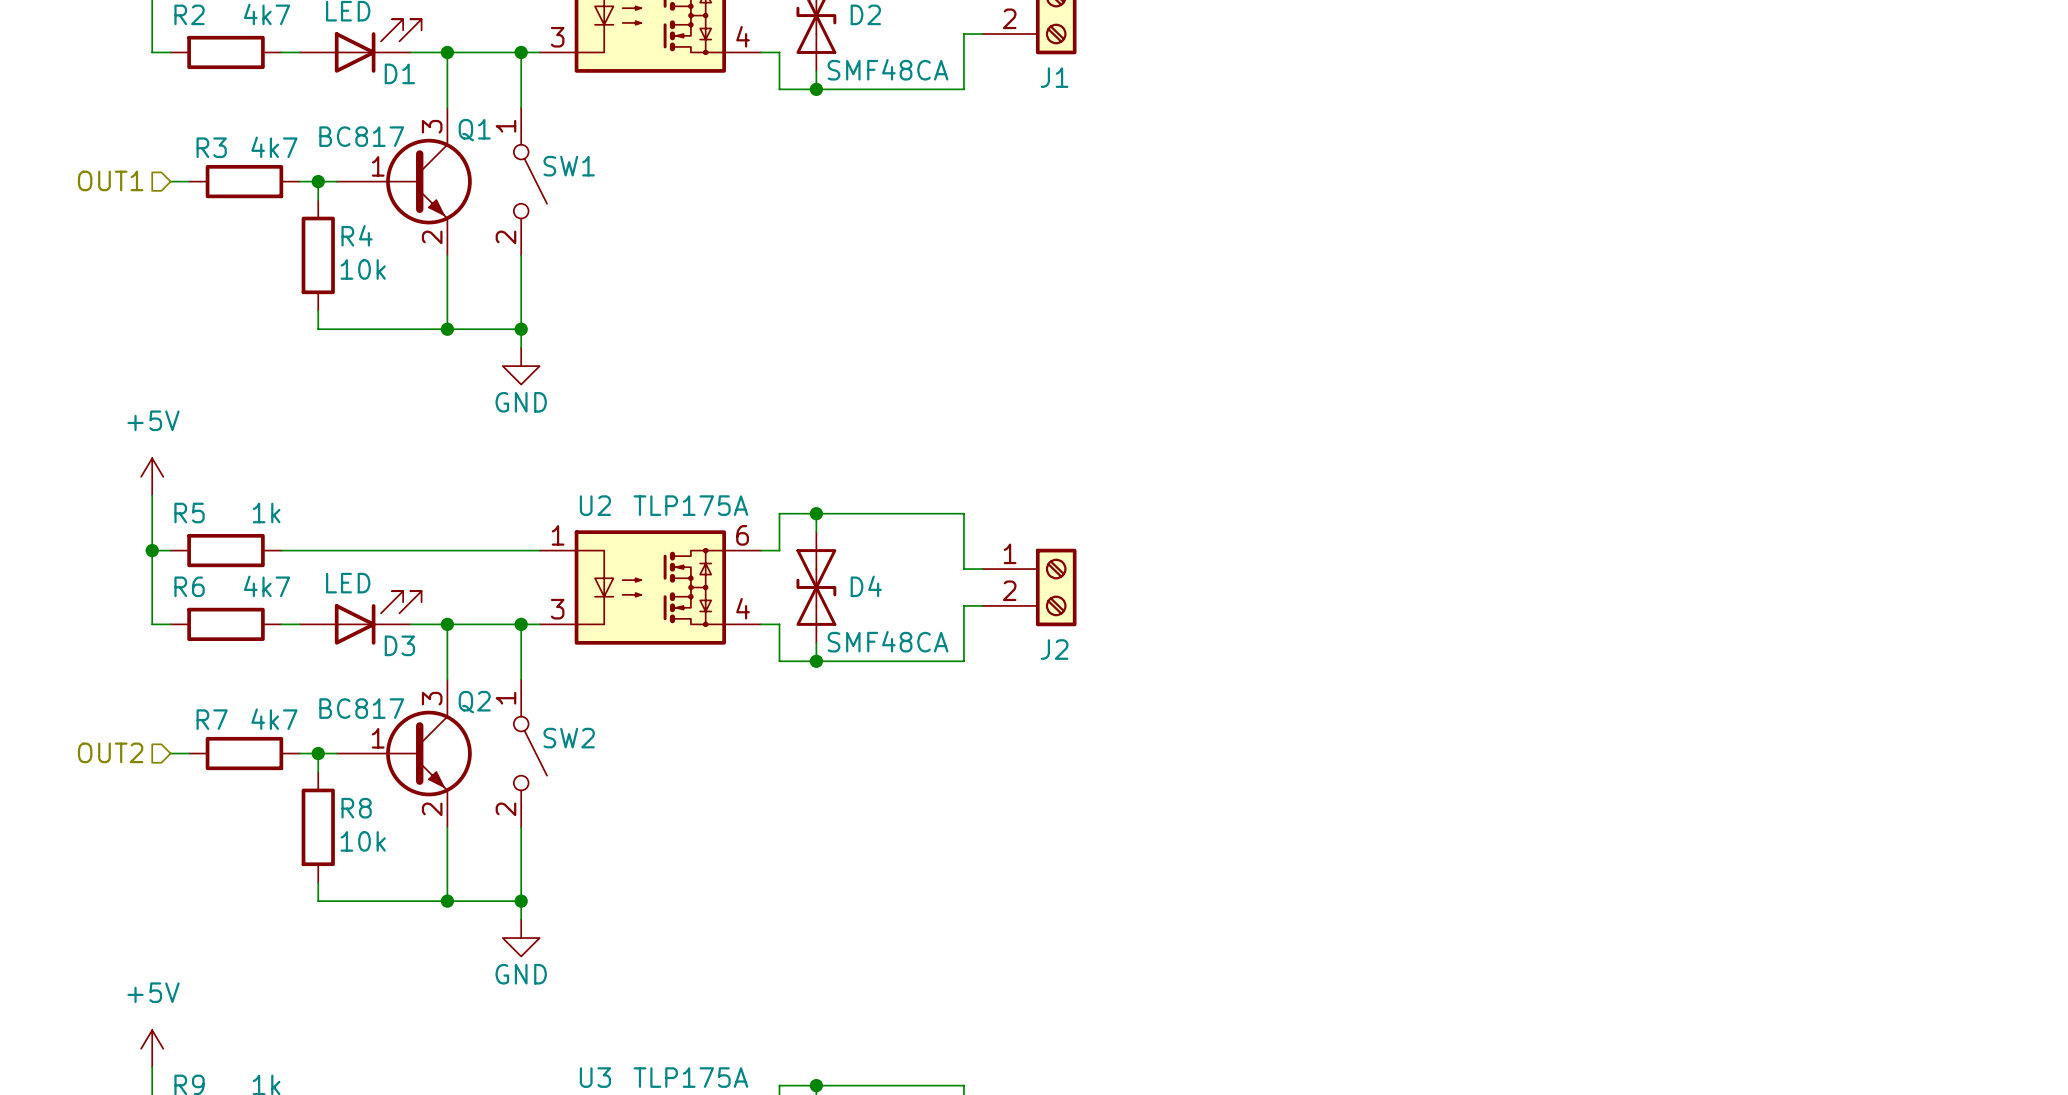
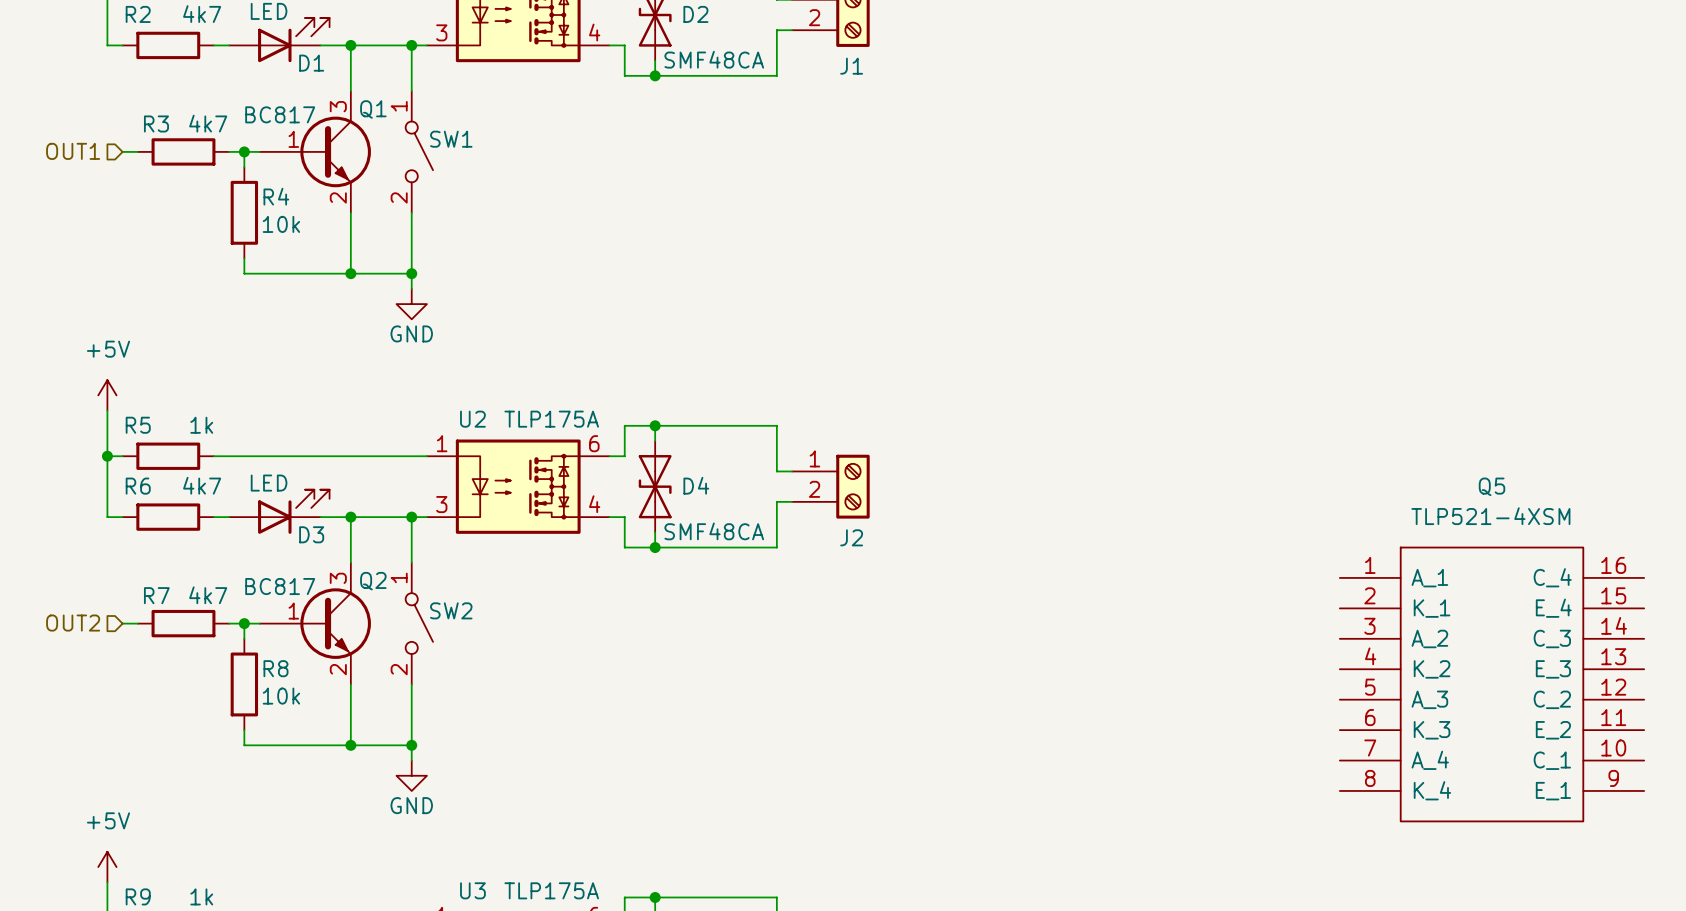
Q5: none -> TLP521-4XSM (1492, 684)

